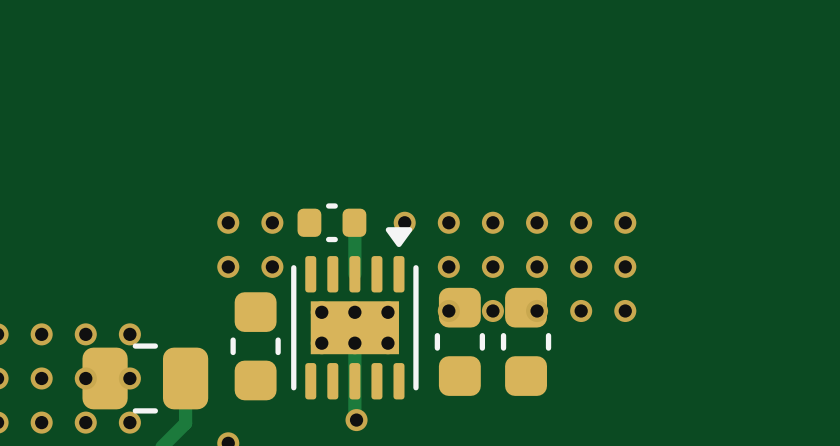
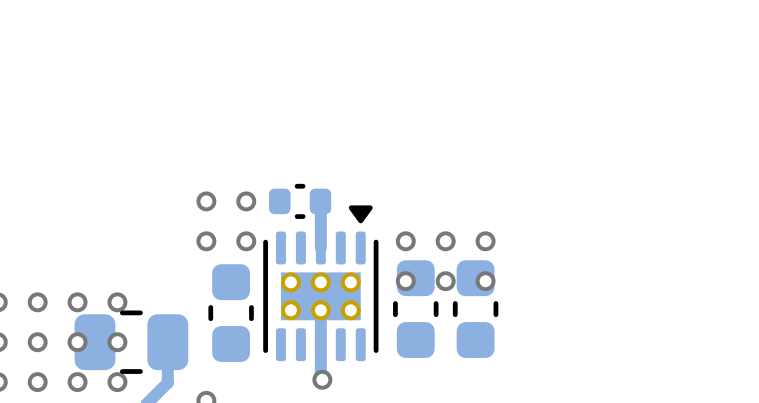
via: (404, 222) -> none
via: (448, 222) -> none
via: (492, 222) -> none
via: (537, 222) -> none
via: (581, 222) -> none
via: (625, 222) -> none
via: (581, 266) -> none
via: (625, 266) -> none
via: (581, 310) -> none
via: (625, 310) -> none

